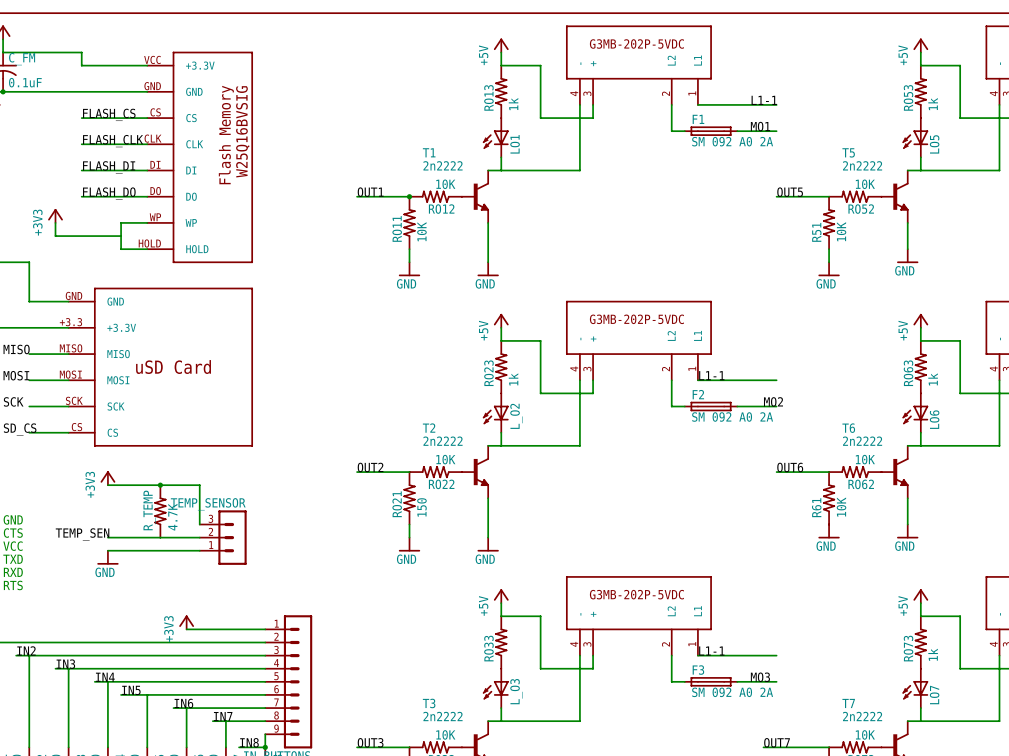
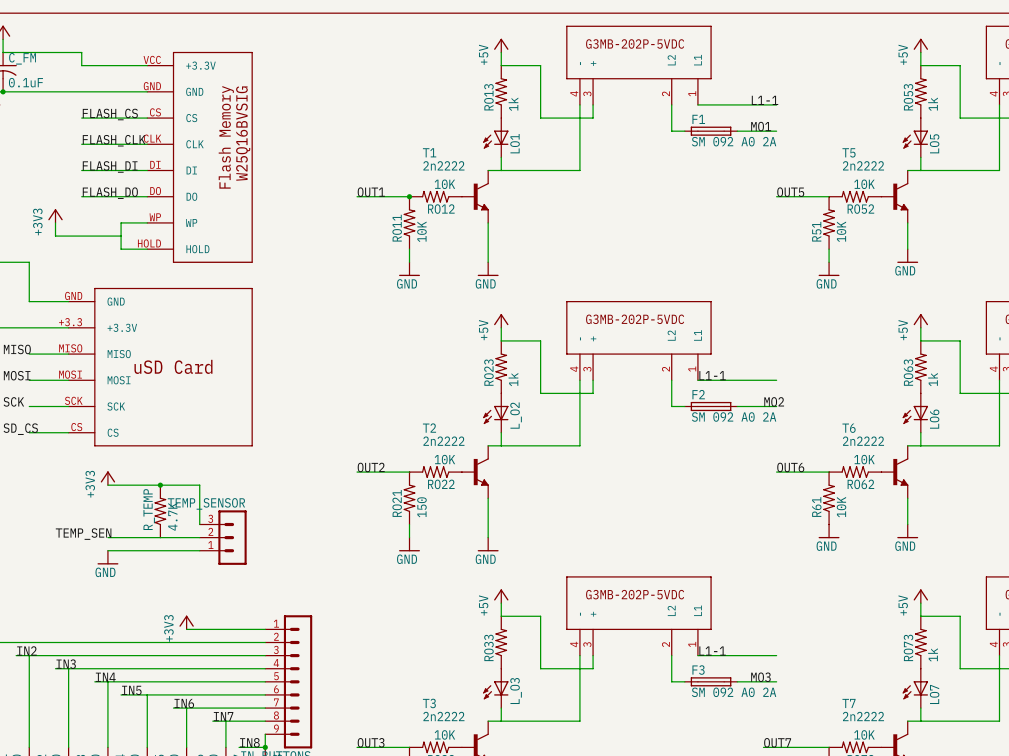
text: GND (13, 519) -> none
text: CTS (13, 533) -> none
text: VCC (13, 546) -> none
text: TXD (13, 559) -> none
text: RXD (13, 572) -> none
text: RTS (13, 585) -> none

